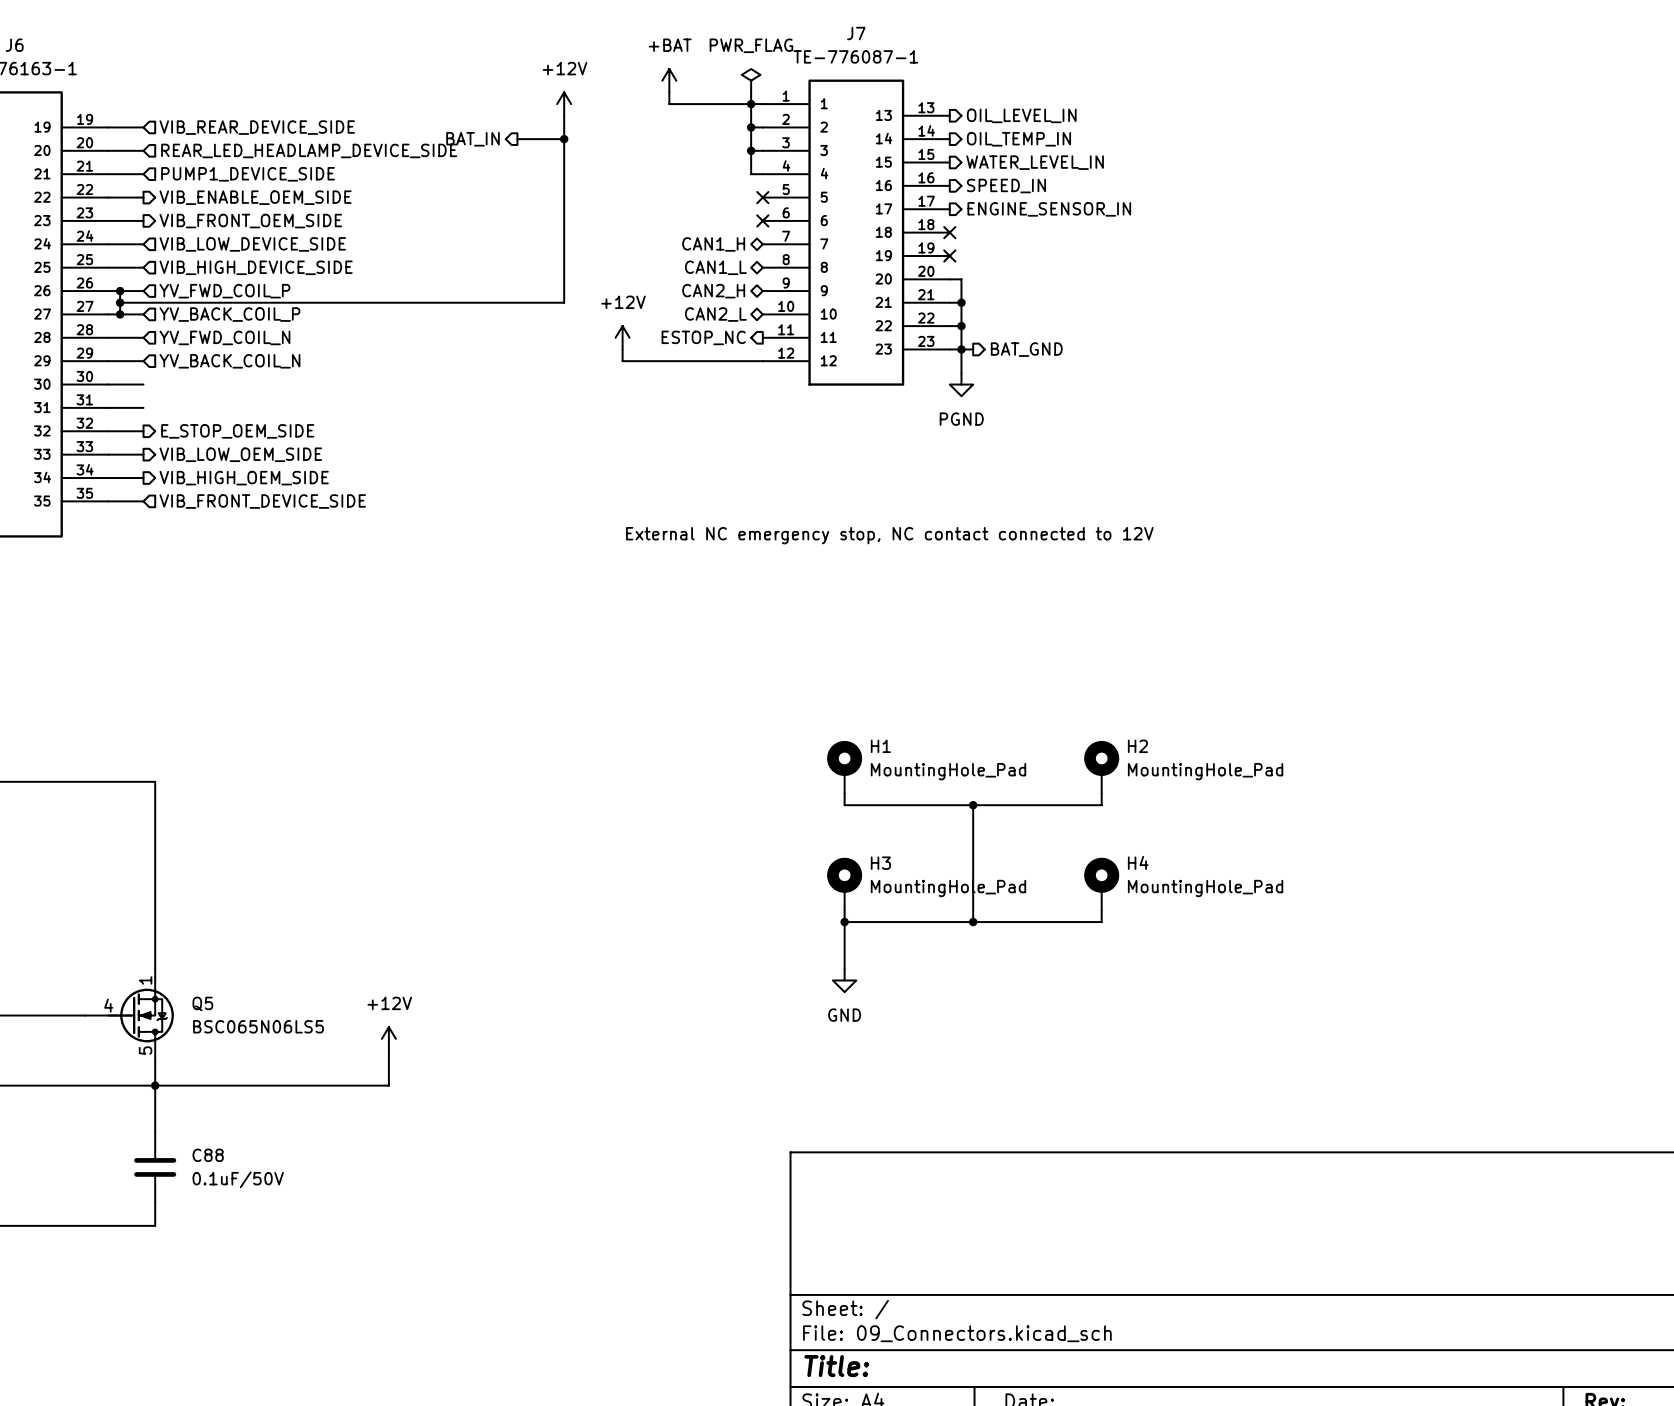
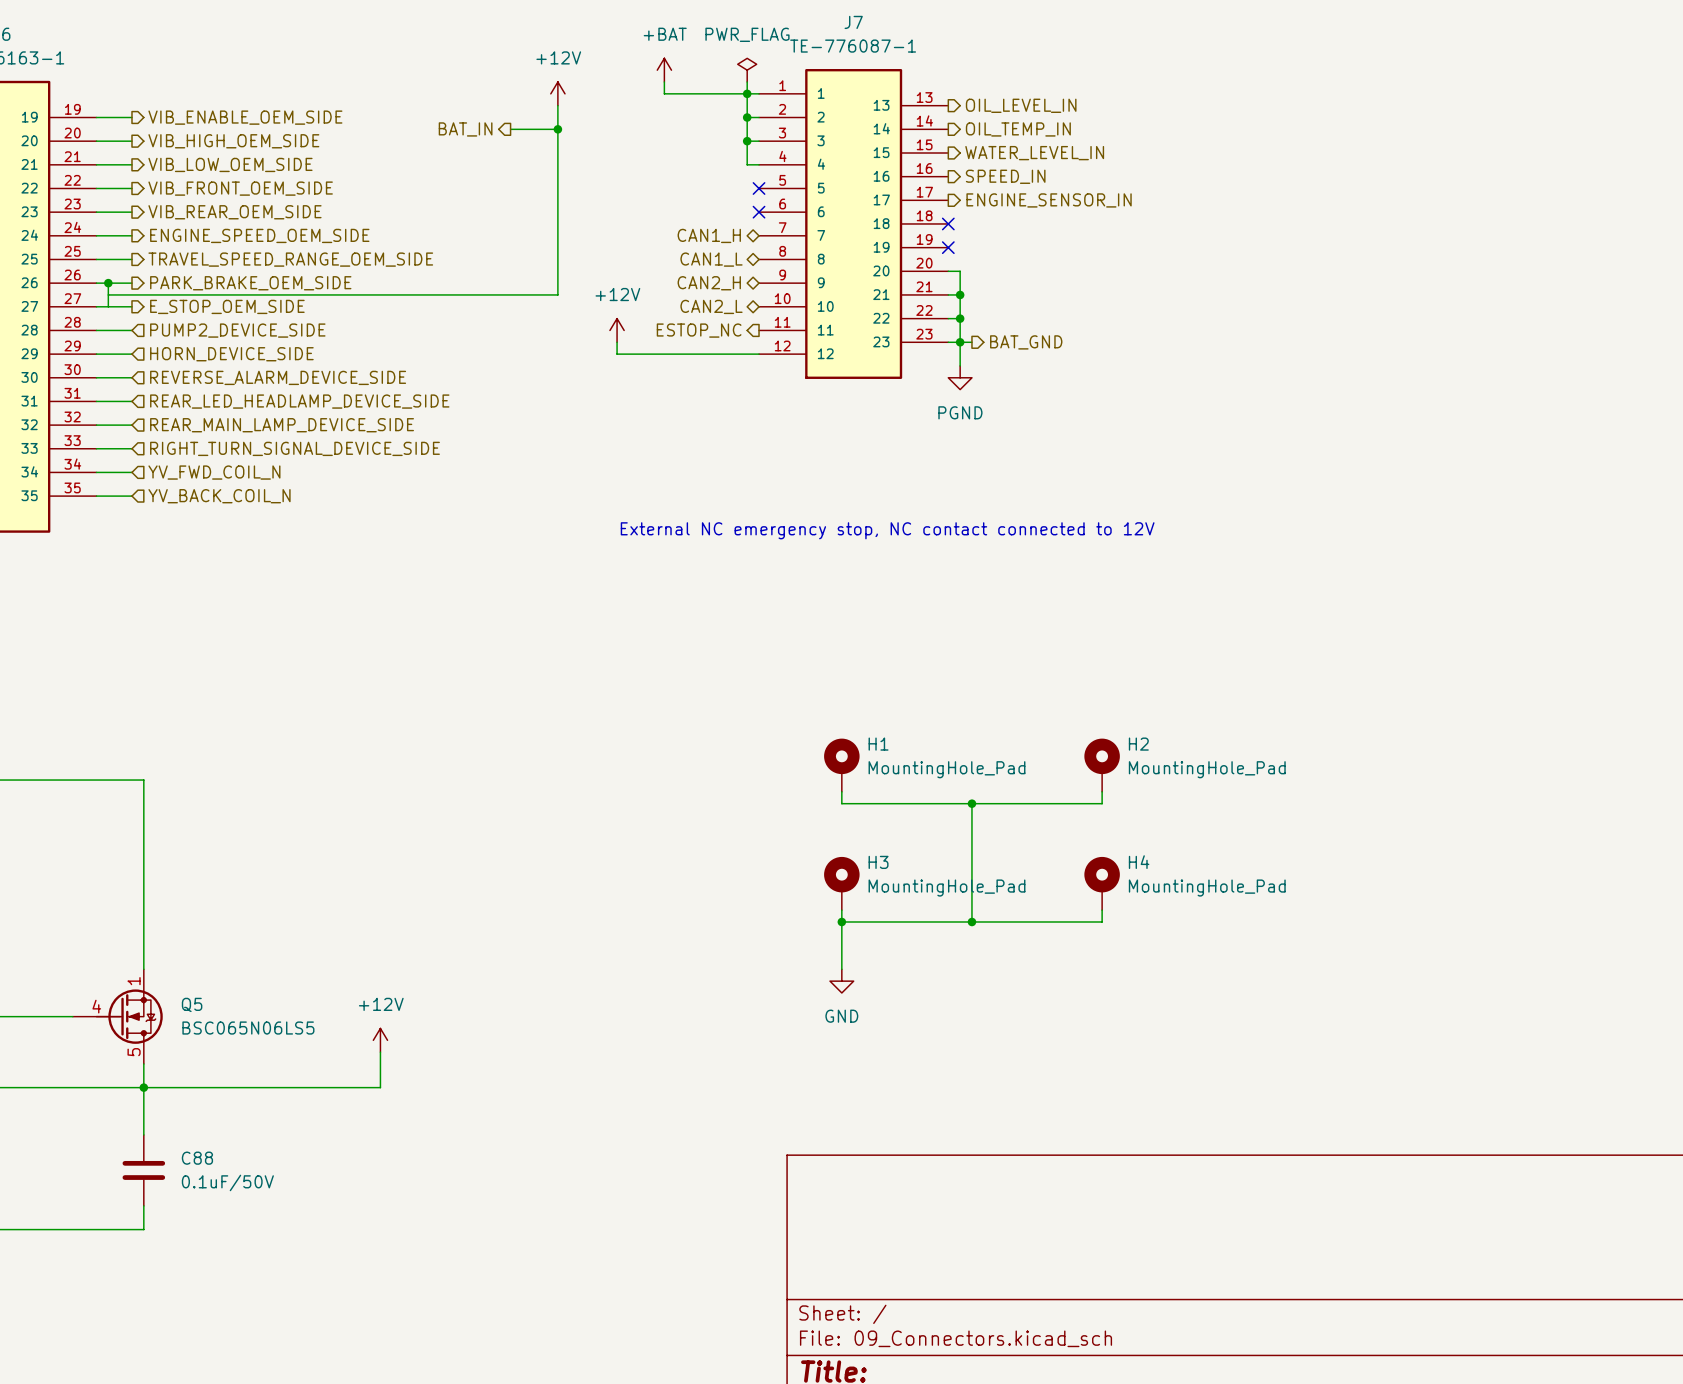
hierarchical label shape: input (257, 127) -> output (245, 117)
hierarchical label: VIB_REAR_DEVICE_SIDE (257, 127) -> VIB_ENABLE_OEM_SIDE (245, 117)
hierarchical label shape: input (309, 150) -> output (233, 141)
hierarchical label: REAR_LED_HEADLAMP_DEVICE_SIDE (309, 150) -> VIB_HIGH_OEM_SIDE (233, 141)
hierarchical label shape: input (248, 174) -> output (230, 164)
hierarchical label: PUMP1_DEVICE_SIDE (248, 174) -> VIB_LOW_OEM_SIDE (230, 164)
hierarchical label: VIB_ENABLE_OEM_SIDE (255, 197) -> VIB_FRONT_OEM_SIDE (240, 188)
hierarchical label: VIB_FRONT_OEM_SIDE (250, 221) -> VIB_REAR_OEM_SIDE (234, 212)
hierarchical label shape: input (252, 244) -> output (259, 235)
hierarchical label: VIB_LOW_DEVICE_SIDE (252, 244) -> ENGINE_SPEED_OEM_SIDE (259, 235)
hierarchical label shape: input (256, 267) -> output (290, 259)
hierarchical label: VIB_HIGH_DEVICE_SIDE (256, 267) -> TRAVEL_SPEED_RANGE_OEM_SIDE (290, 259)
hierarchical label shape: input (224, 291) -> output (250, 283)
hierarchical label: YV_FWD_COIL_P (224, 291) -> PARK_BRAKE_OEM_SIDE (250, 283)
junction: (120, 302) -> none
junction: (120, 314) -> none
hierarchical label shape: input (229, 314) -> output (227, 306)
hierarchical label: YV_BACK_COIL_P (229, 314) -> E_STOP_OEM_SIDE (227, 306)
hierarchical label: YV_FWD_COIL_N (224, 337) -> PUMP2_DEVICE_SIDE (237, 330)
hierarchical label: YV_BACK_COIL_N (229, 361) -> HORN_DEVICE_SIDE (231, 354)
hierarchical label: none -> REVERSE_ALARM_DEVICE_SIDE (278, 377)
hierarchical label: none -> REAR_LED_HEADLAMP_DEVICE_SIDE (299, 401)
hierarchical label shape: output (237, 431) -> input (282, 425)
hierarchical label: E_STOP_OEM_SIDE (237, 431) -> REAR_MAIN_LAMP_DEVICE_SIDE (282, 425)
hierarchical label shape: output (240, 454) -> input (294, 448)
hierarchical label: VIB_LOW_OEM_SIDE (240, 454) -> RIGHT_TURN_SIGNAL_DEVICE_SIDE (294, 448)
hierarchical label shape: output (244, 478) -> input (214, 472)
hierarchical label: VIB_HIGH_OEM_SIDE (244, 478) -> YV_FWD_COIL_N (214, 472)
hierarchical label: VIB_FRONT_DEVICE_SIDE (262, 501) -> YV_BACK_COIL_N (219, 496)

